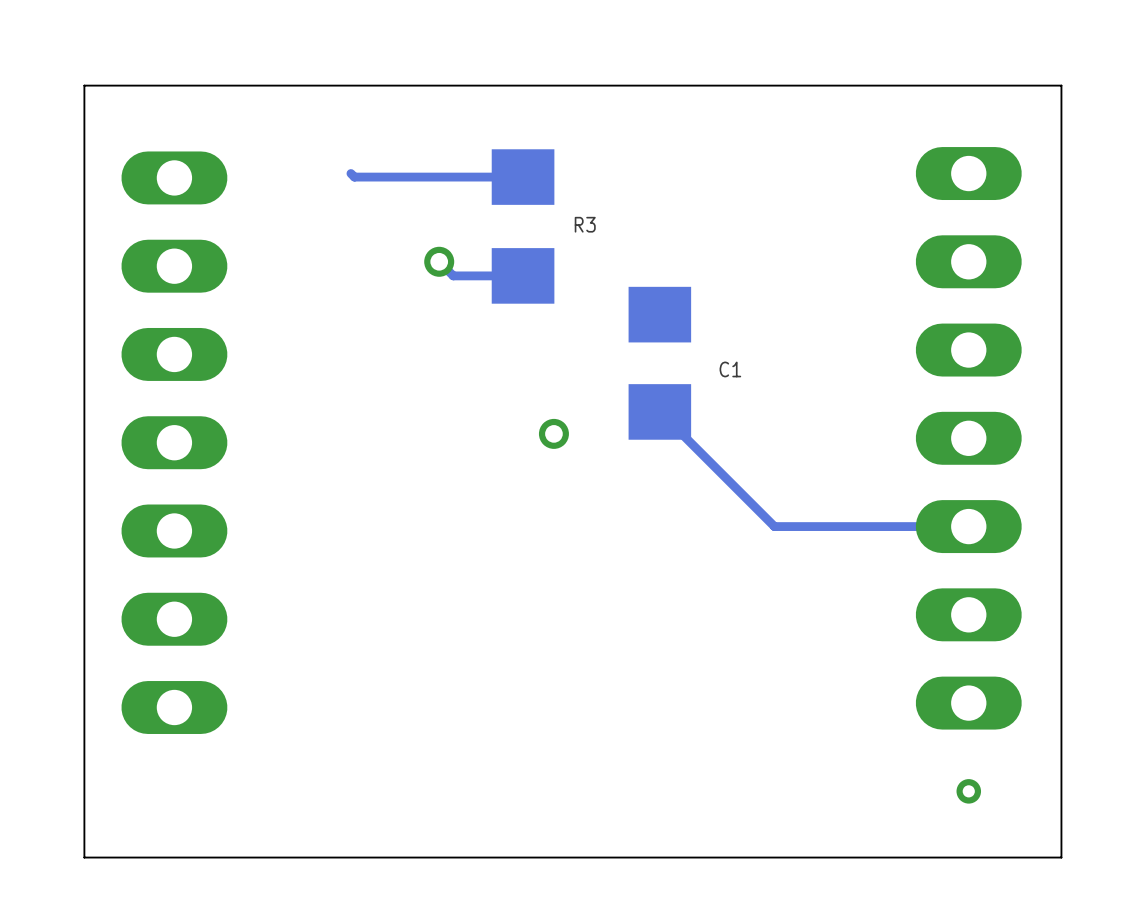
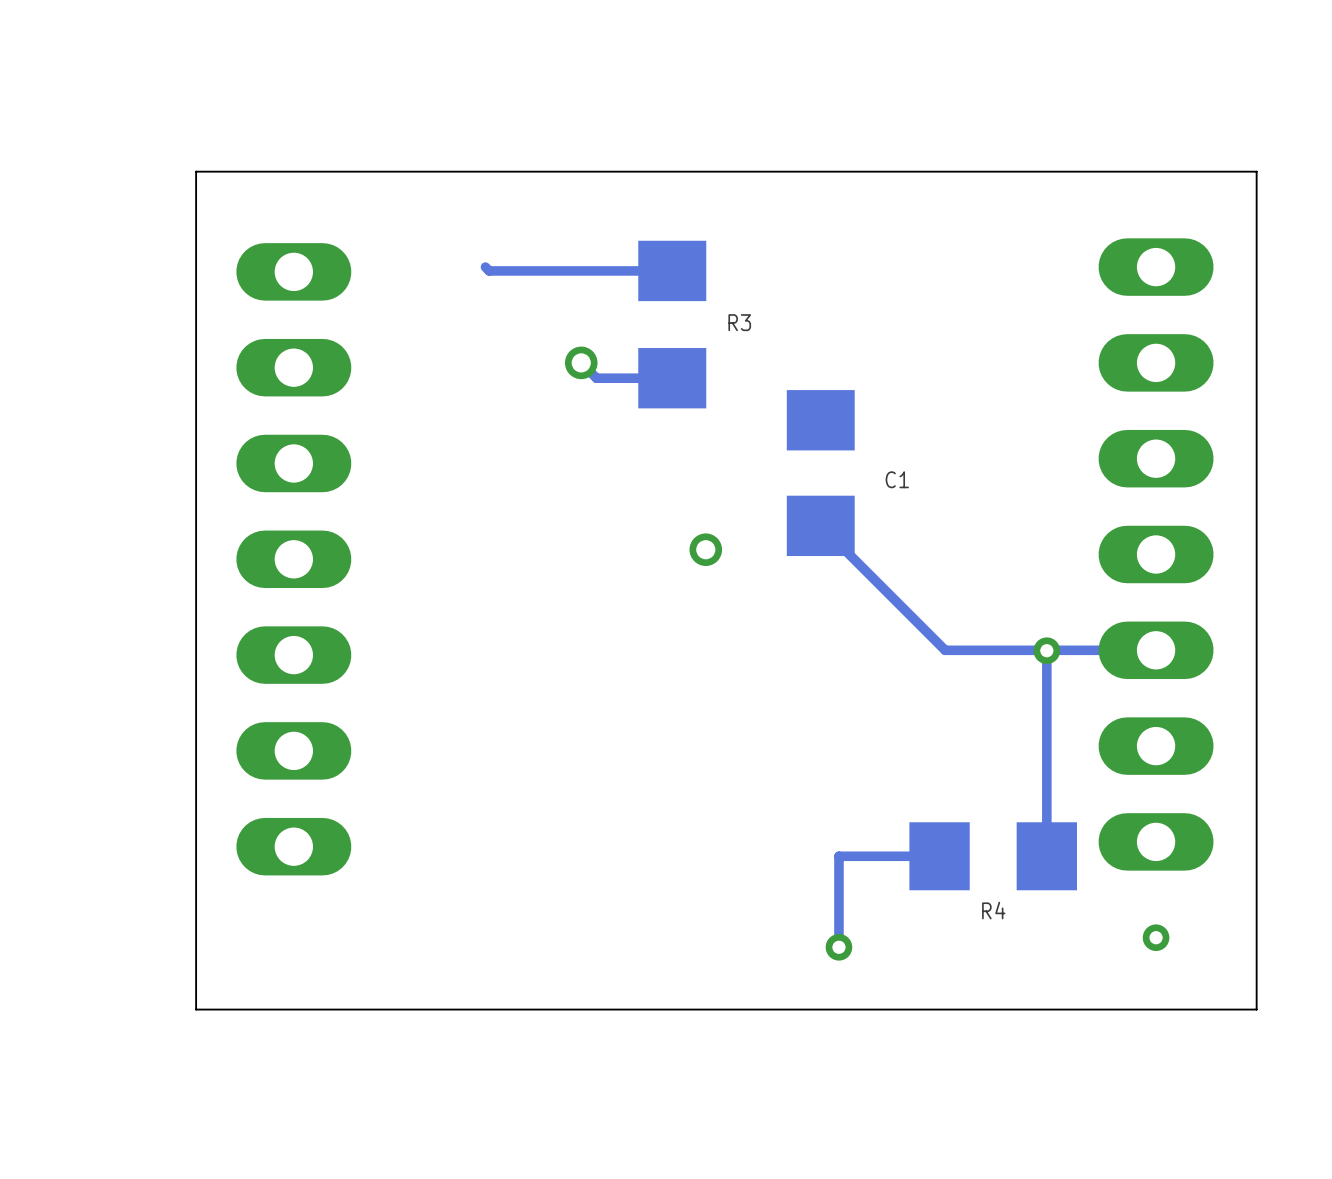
track: none -> (1046, 650) (1046, 856)
via: none -> (1046, 650)
track: none -> (939, 856) (838, 856) (838, 947)
R4: none -> (993, 856)
via: none -> (838, 947)

